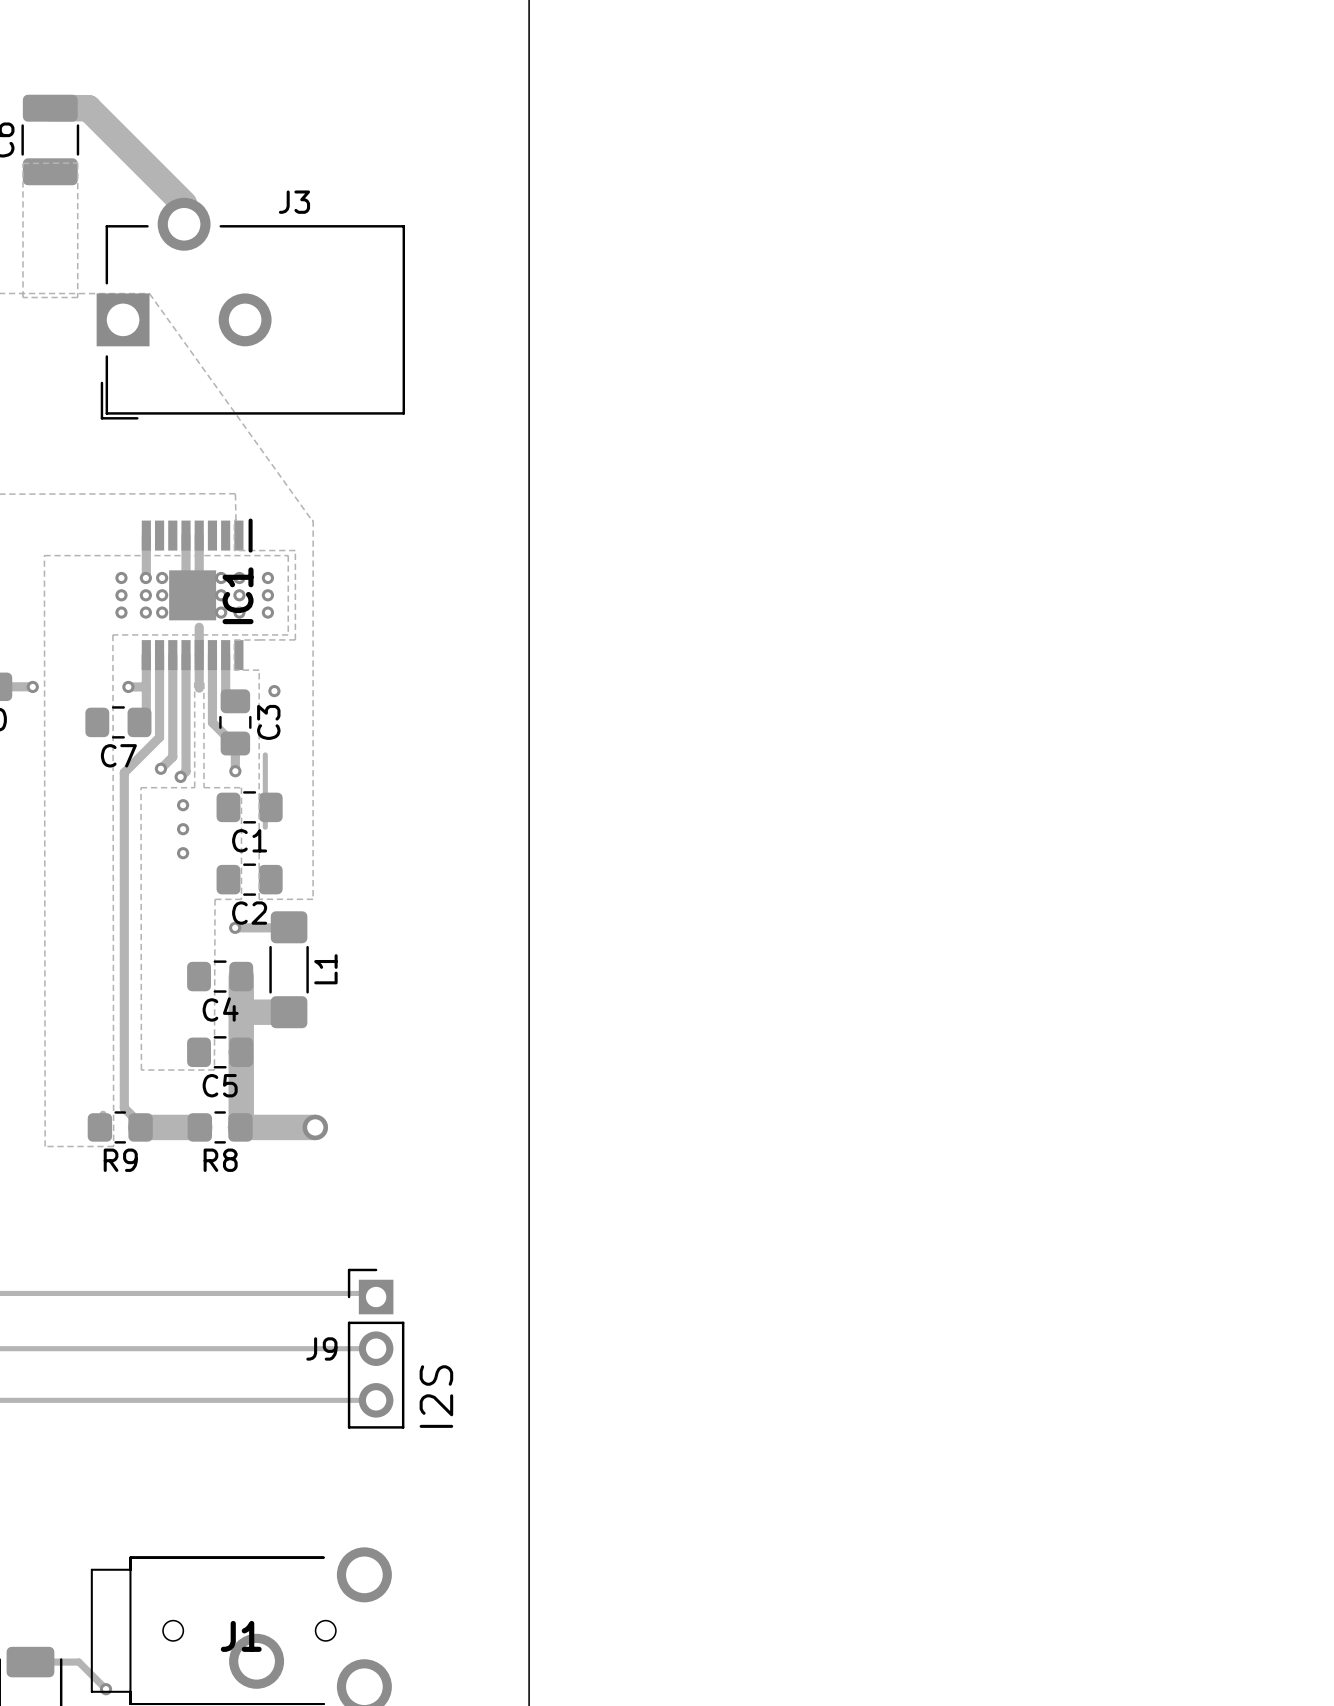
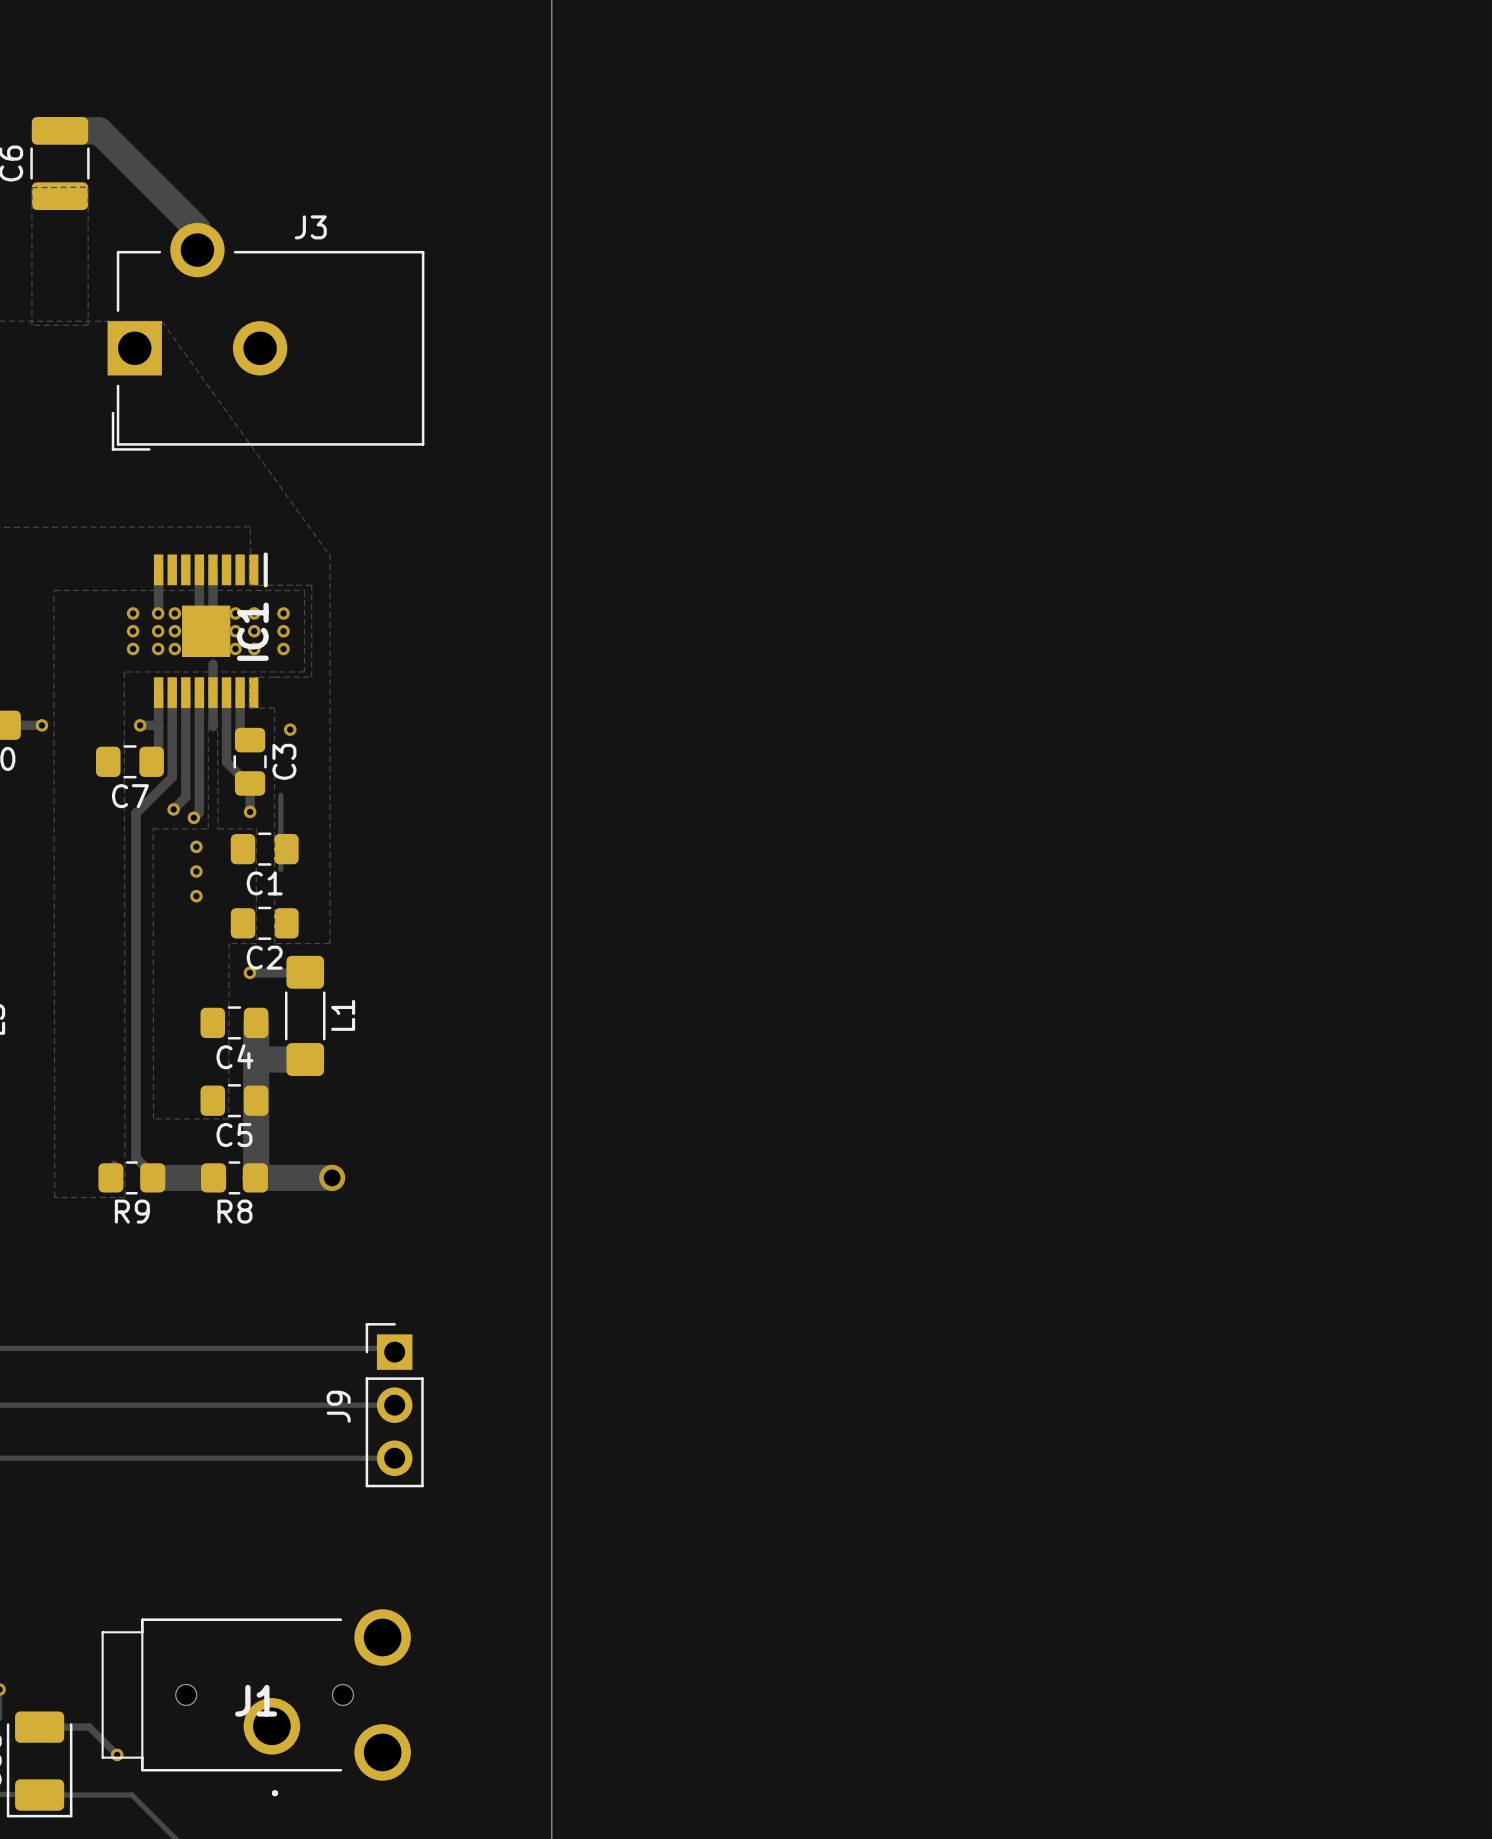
J9 name rotation: 0° (321, 1348) -> 90° counterclockwise (338, 1406)
text: I2S (436, 1396) -> none

